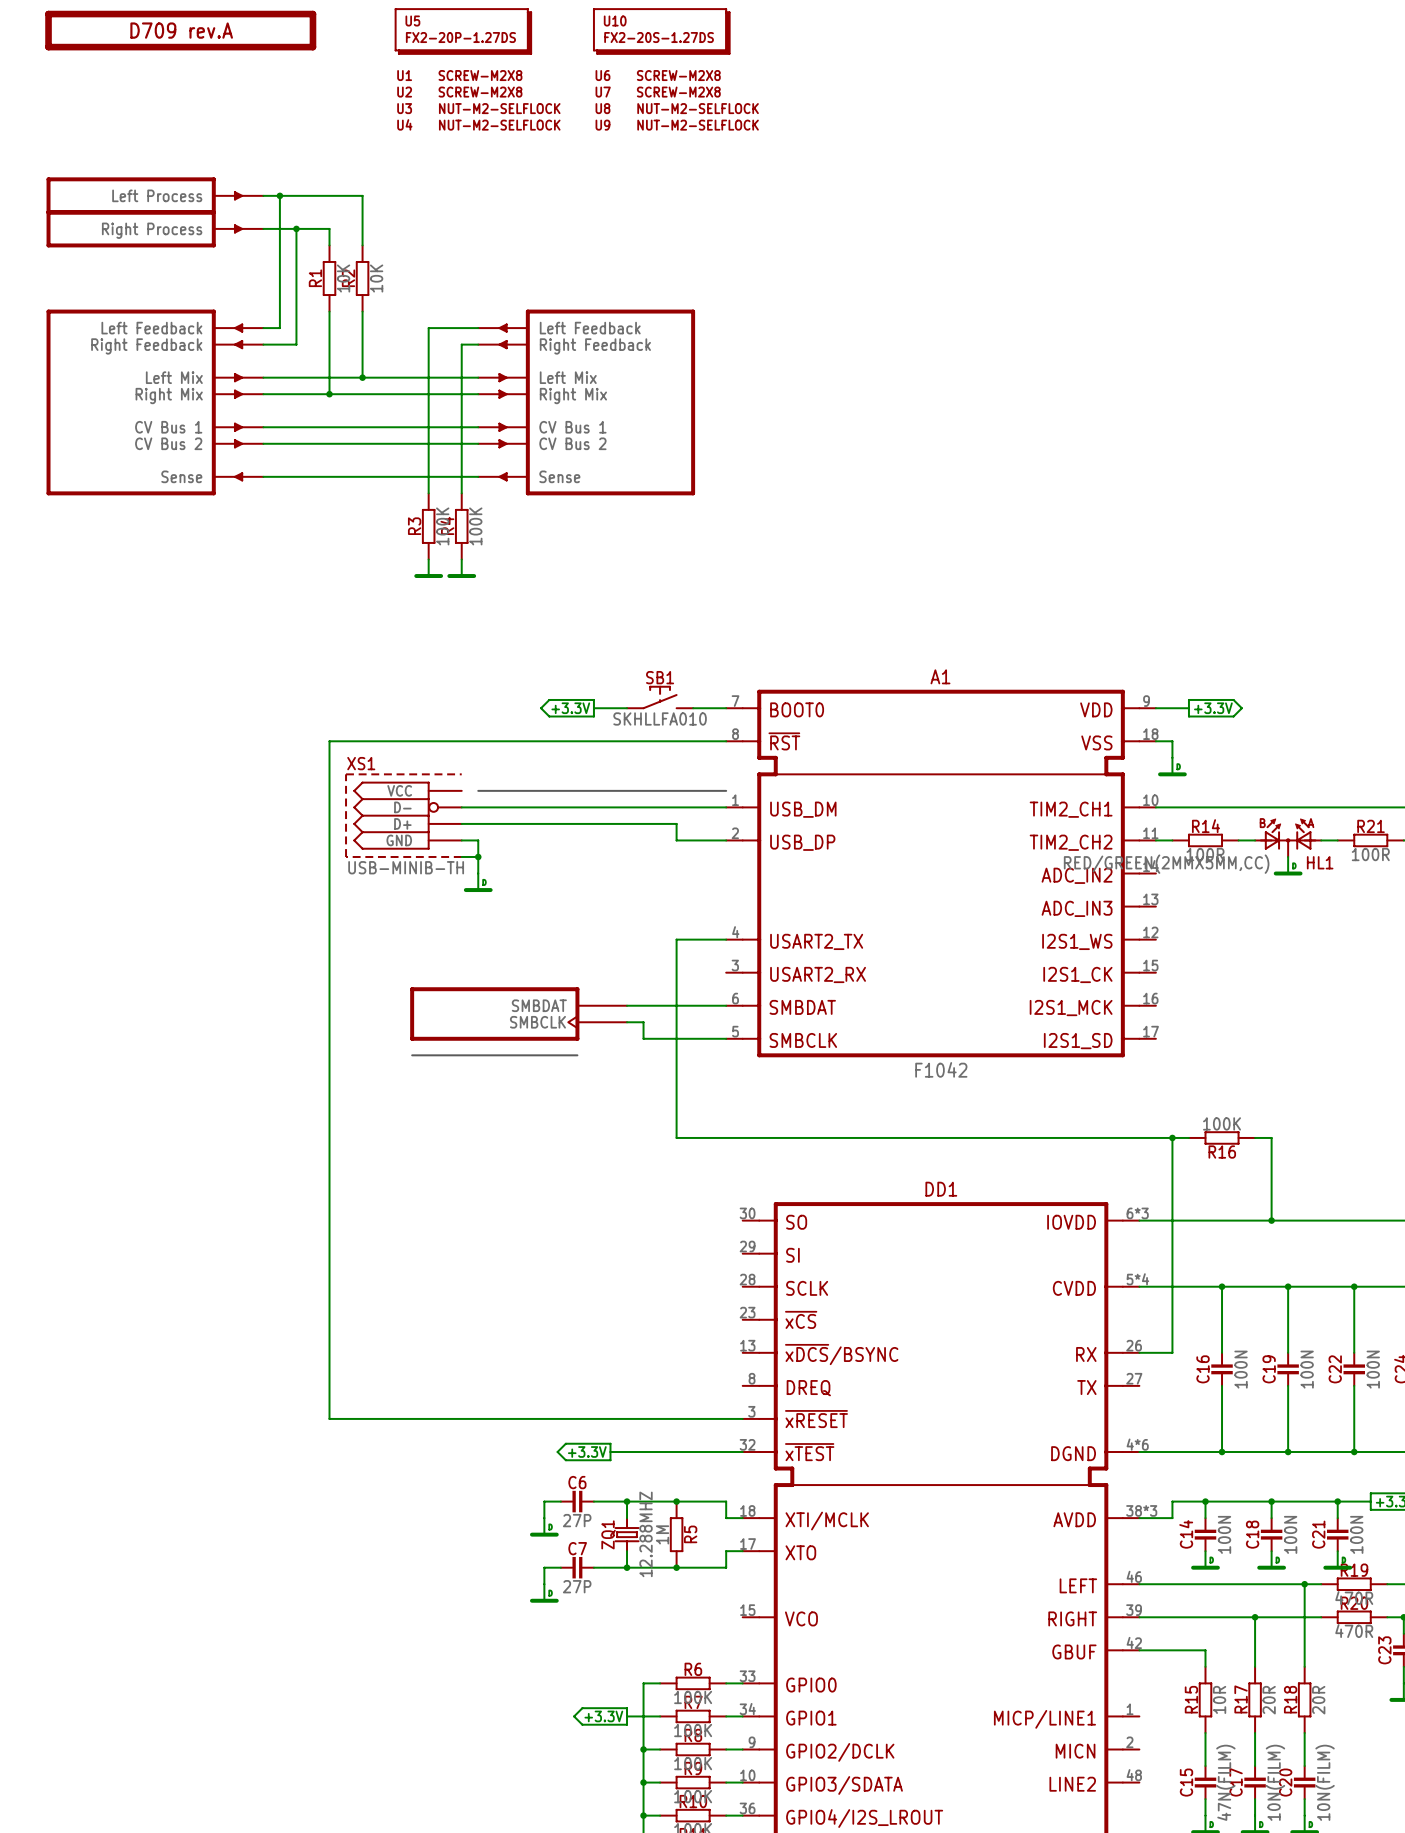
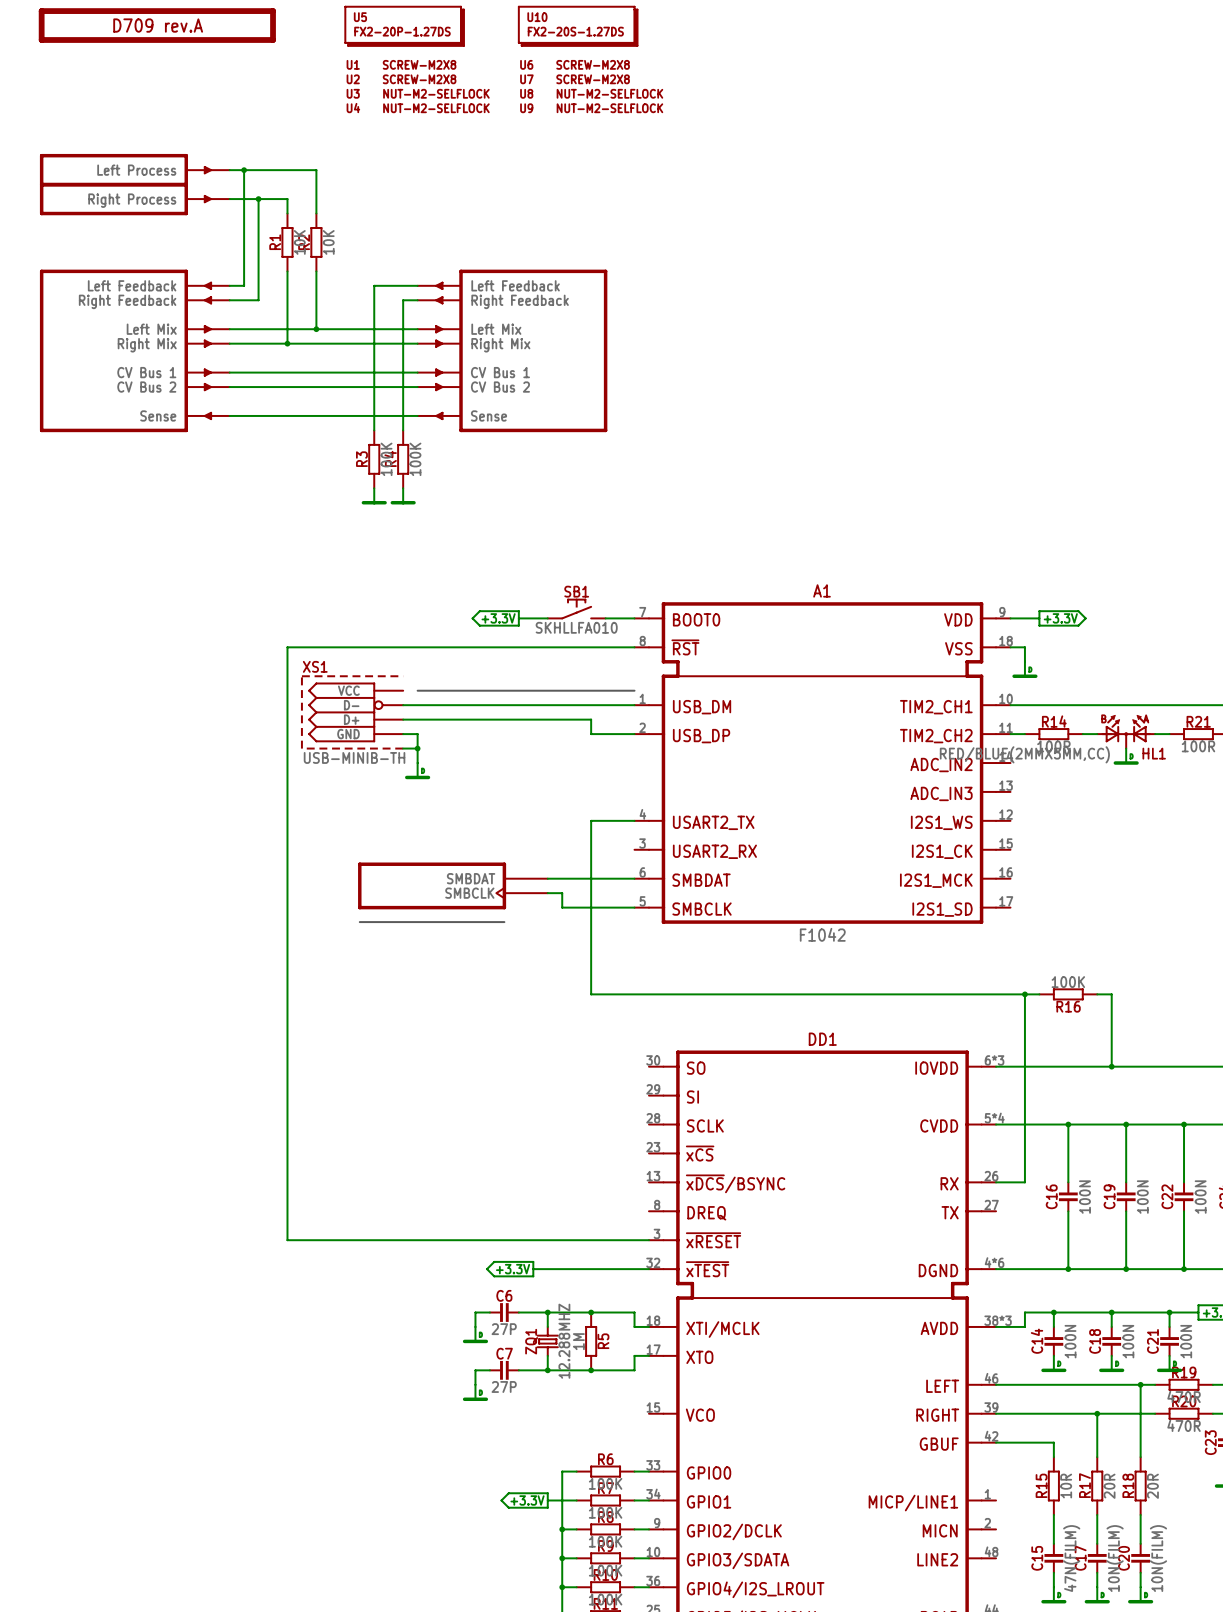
HL1 value: RED/GREEN(2MMX5MM,CC) (1166, 864) -> RED/BLUE(2MMX5MM,CC) (1024, 754)

